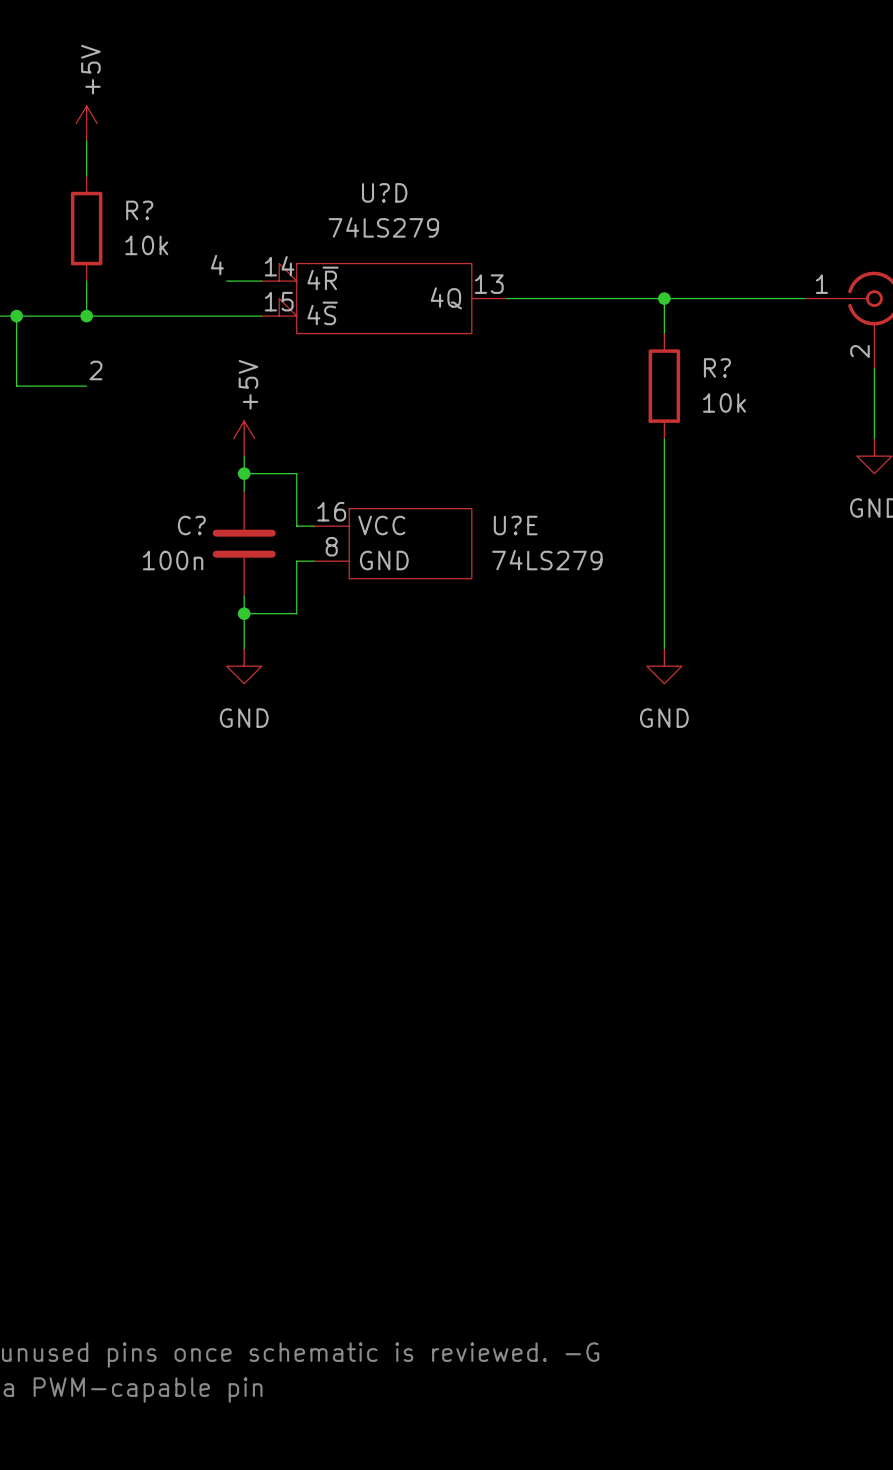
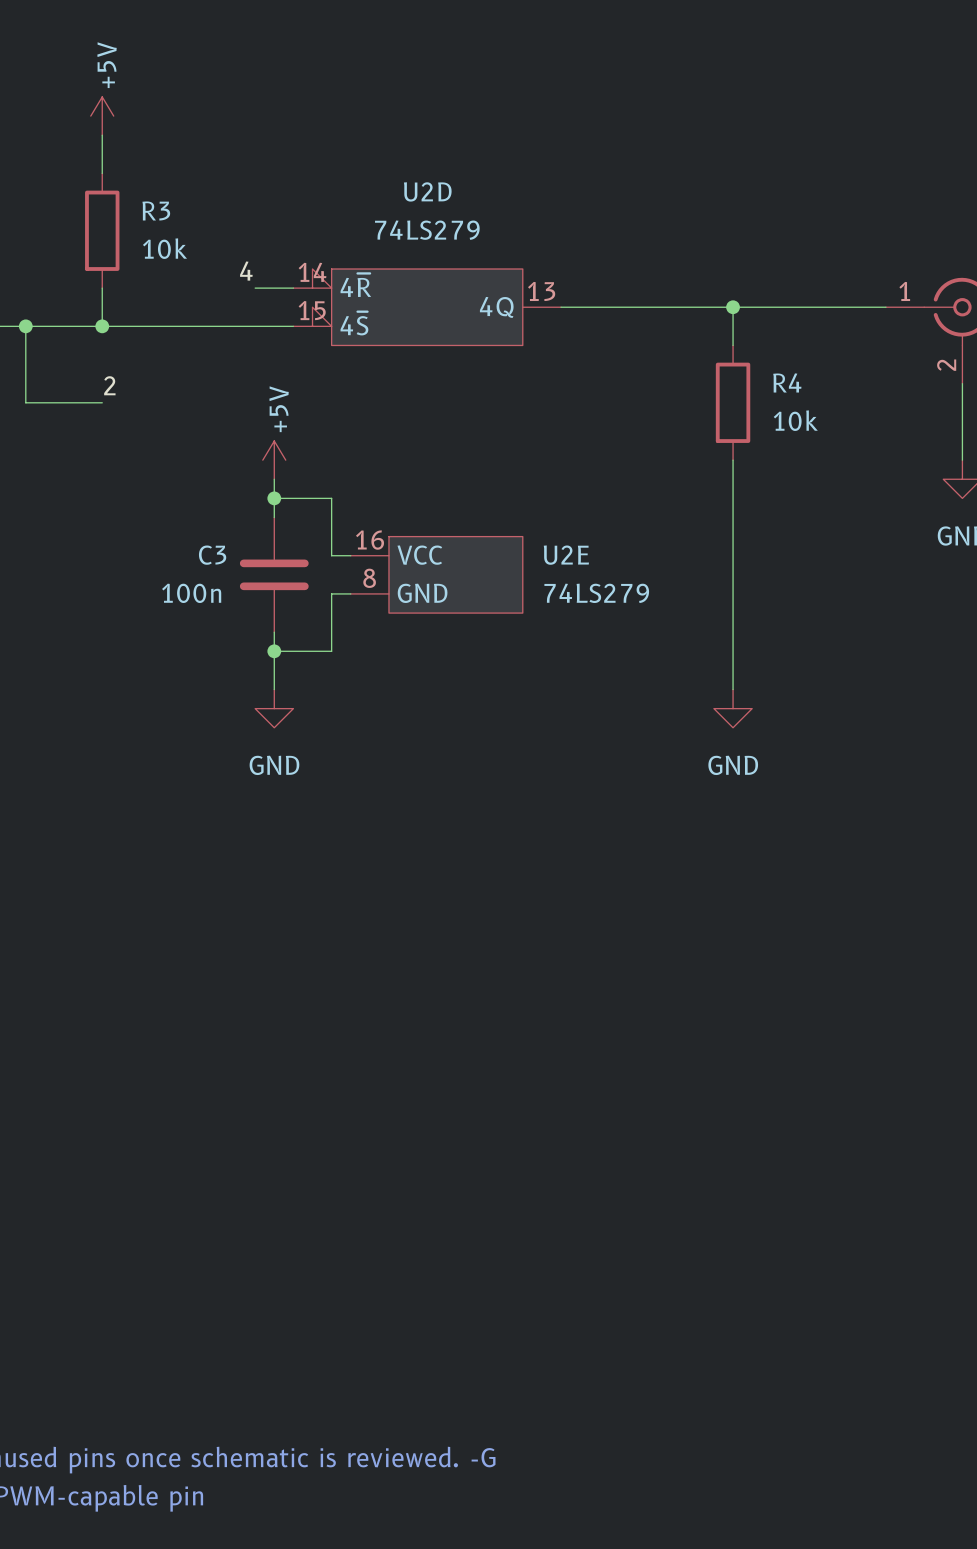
U?D name: U?D (384, 192) -> U2D (427, 191)
R? name: R? (139, 210) -> R3 (156, 210)
R? name: R? (717, 367) -> R4 (787, 382)
C? name: C? (191, 525) -> C3 (212, 555)
U?E name: U?E (515, 525) -> U2E (566, 555)

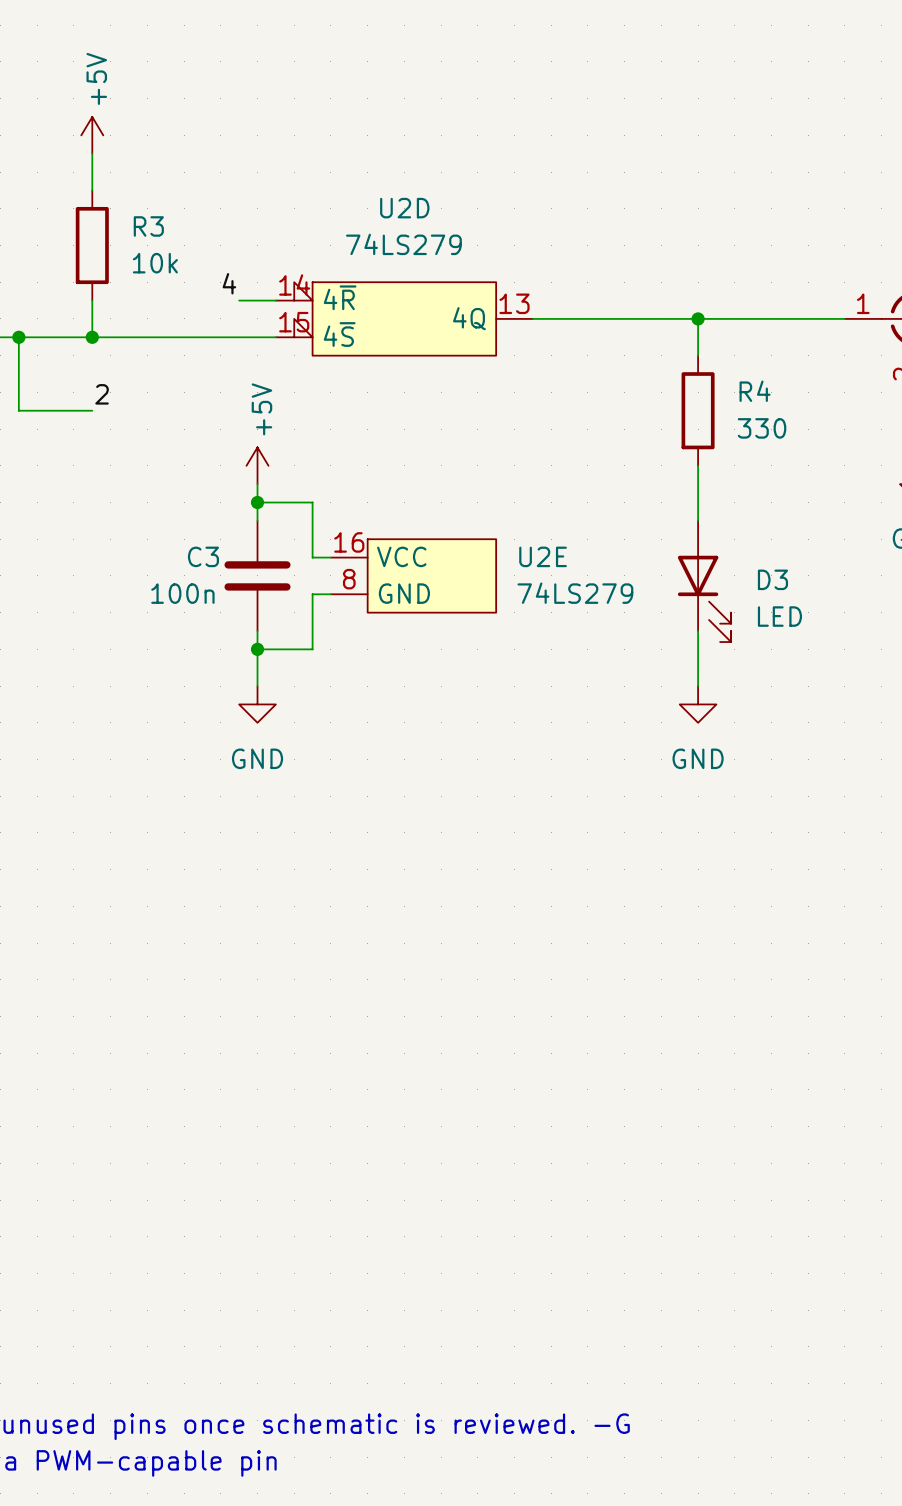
R4 value: 10k (795, 420) -> 330 (762, 428)
D3: none -> LED (704, 581)

